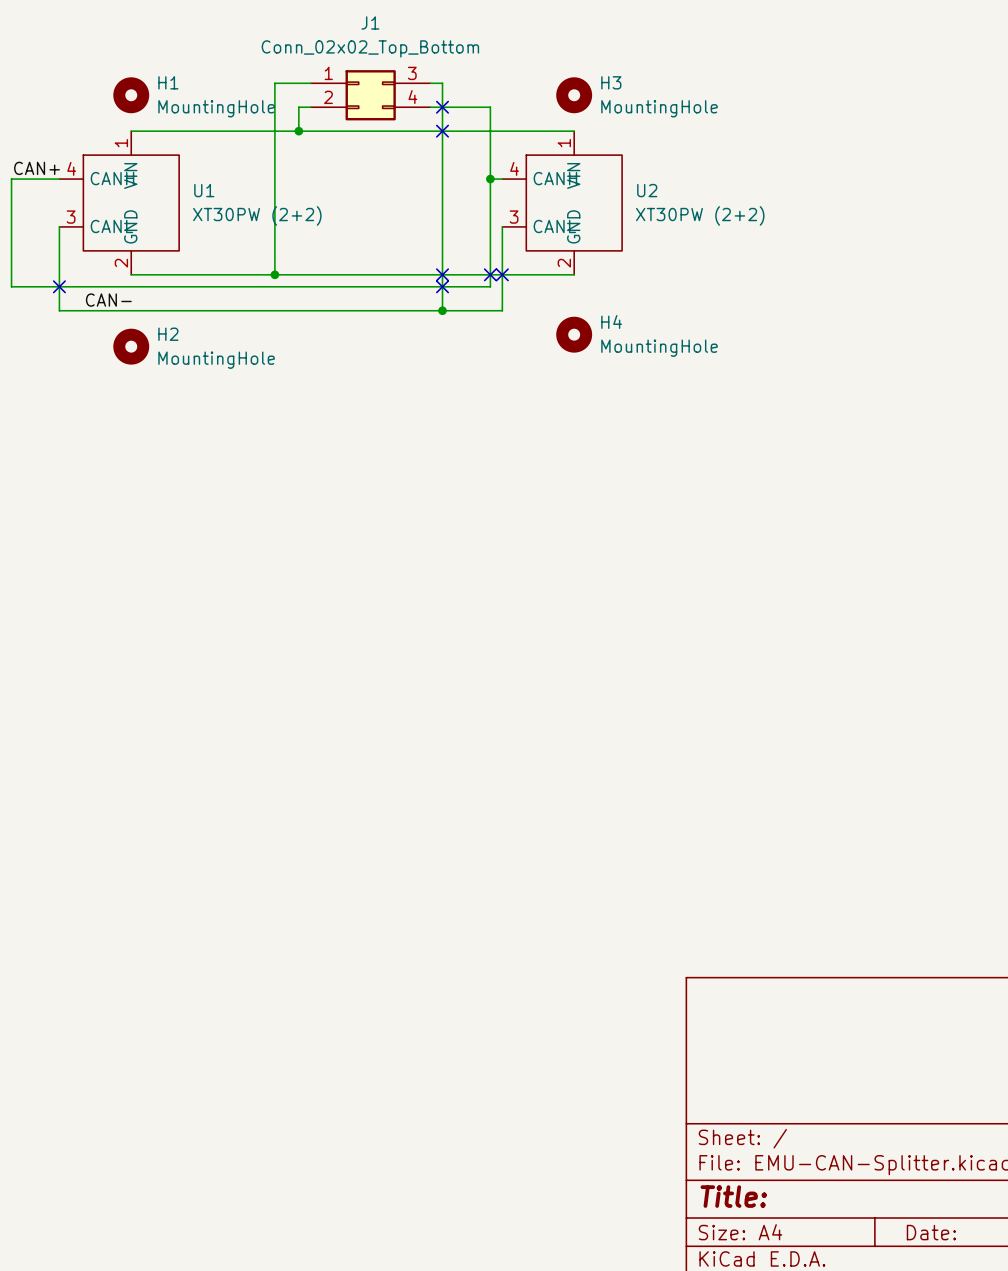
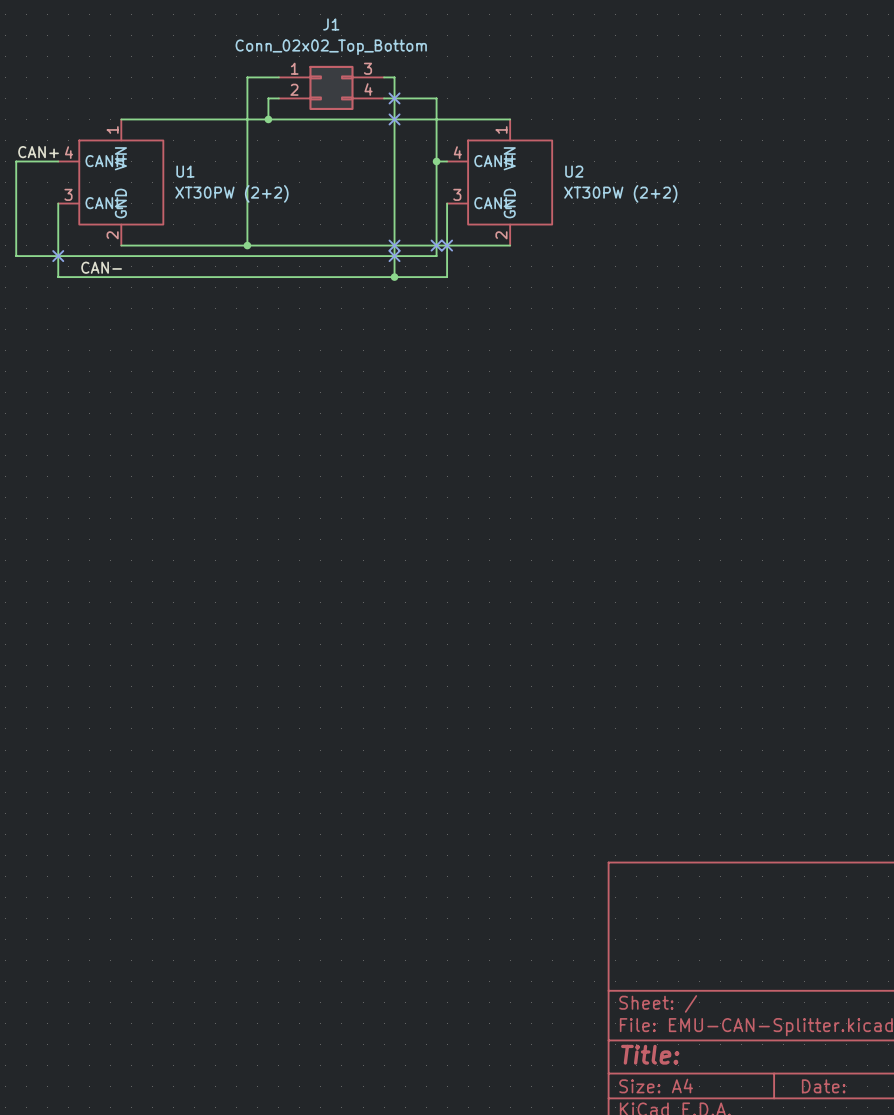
H1: MountingHole (131, 95) -> none
H3: MountingHole (574, 95) -> none
H4: MountingHole (574, 334) -> none
H2: MountingHole (131, 346) -> none

